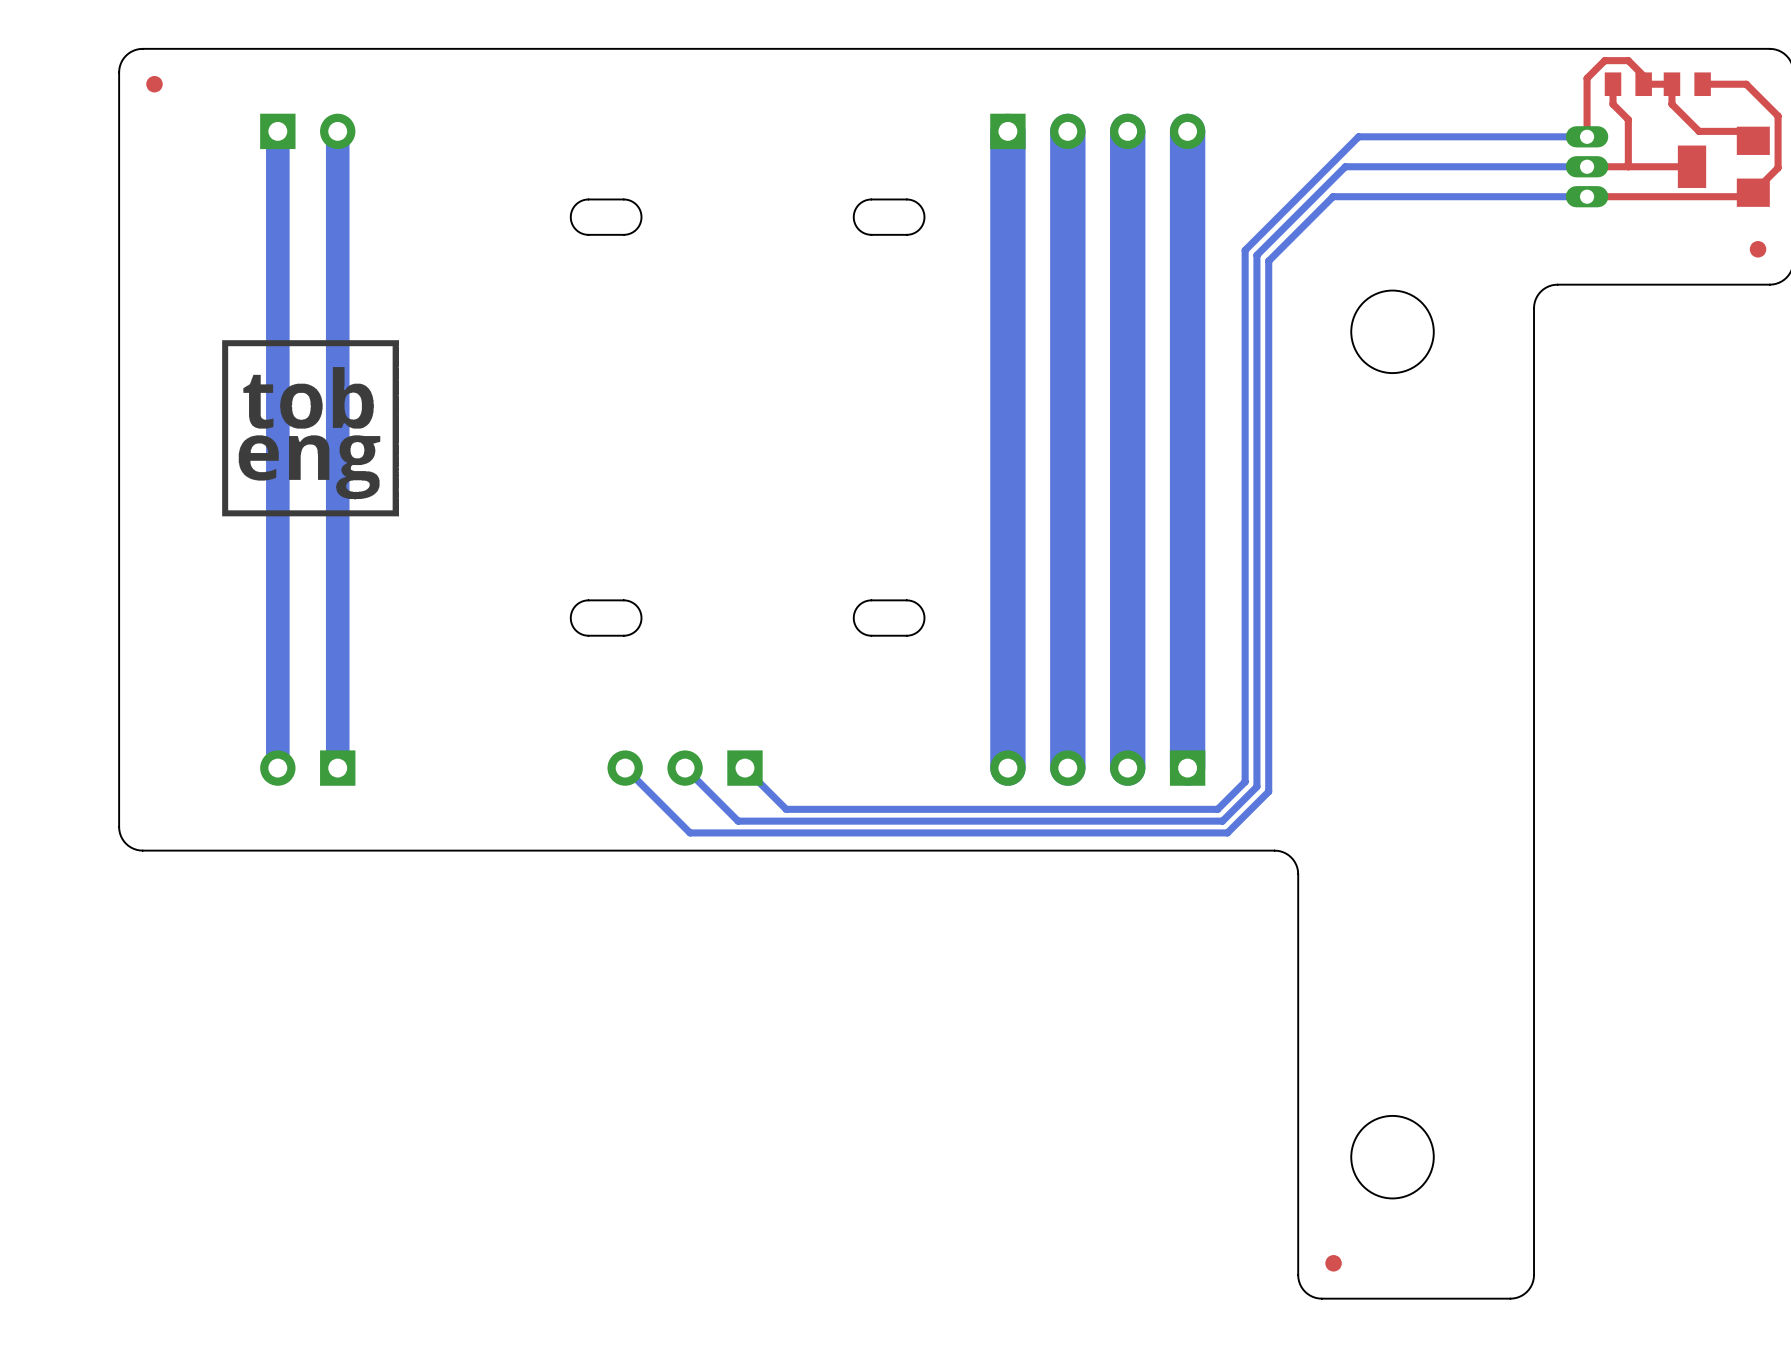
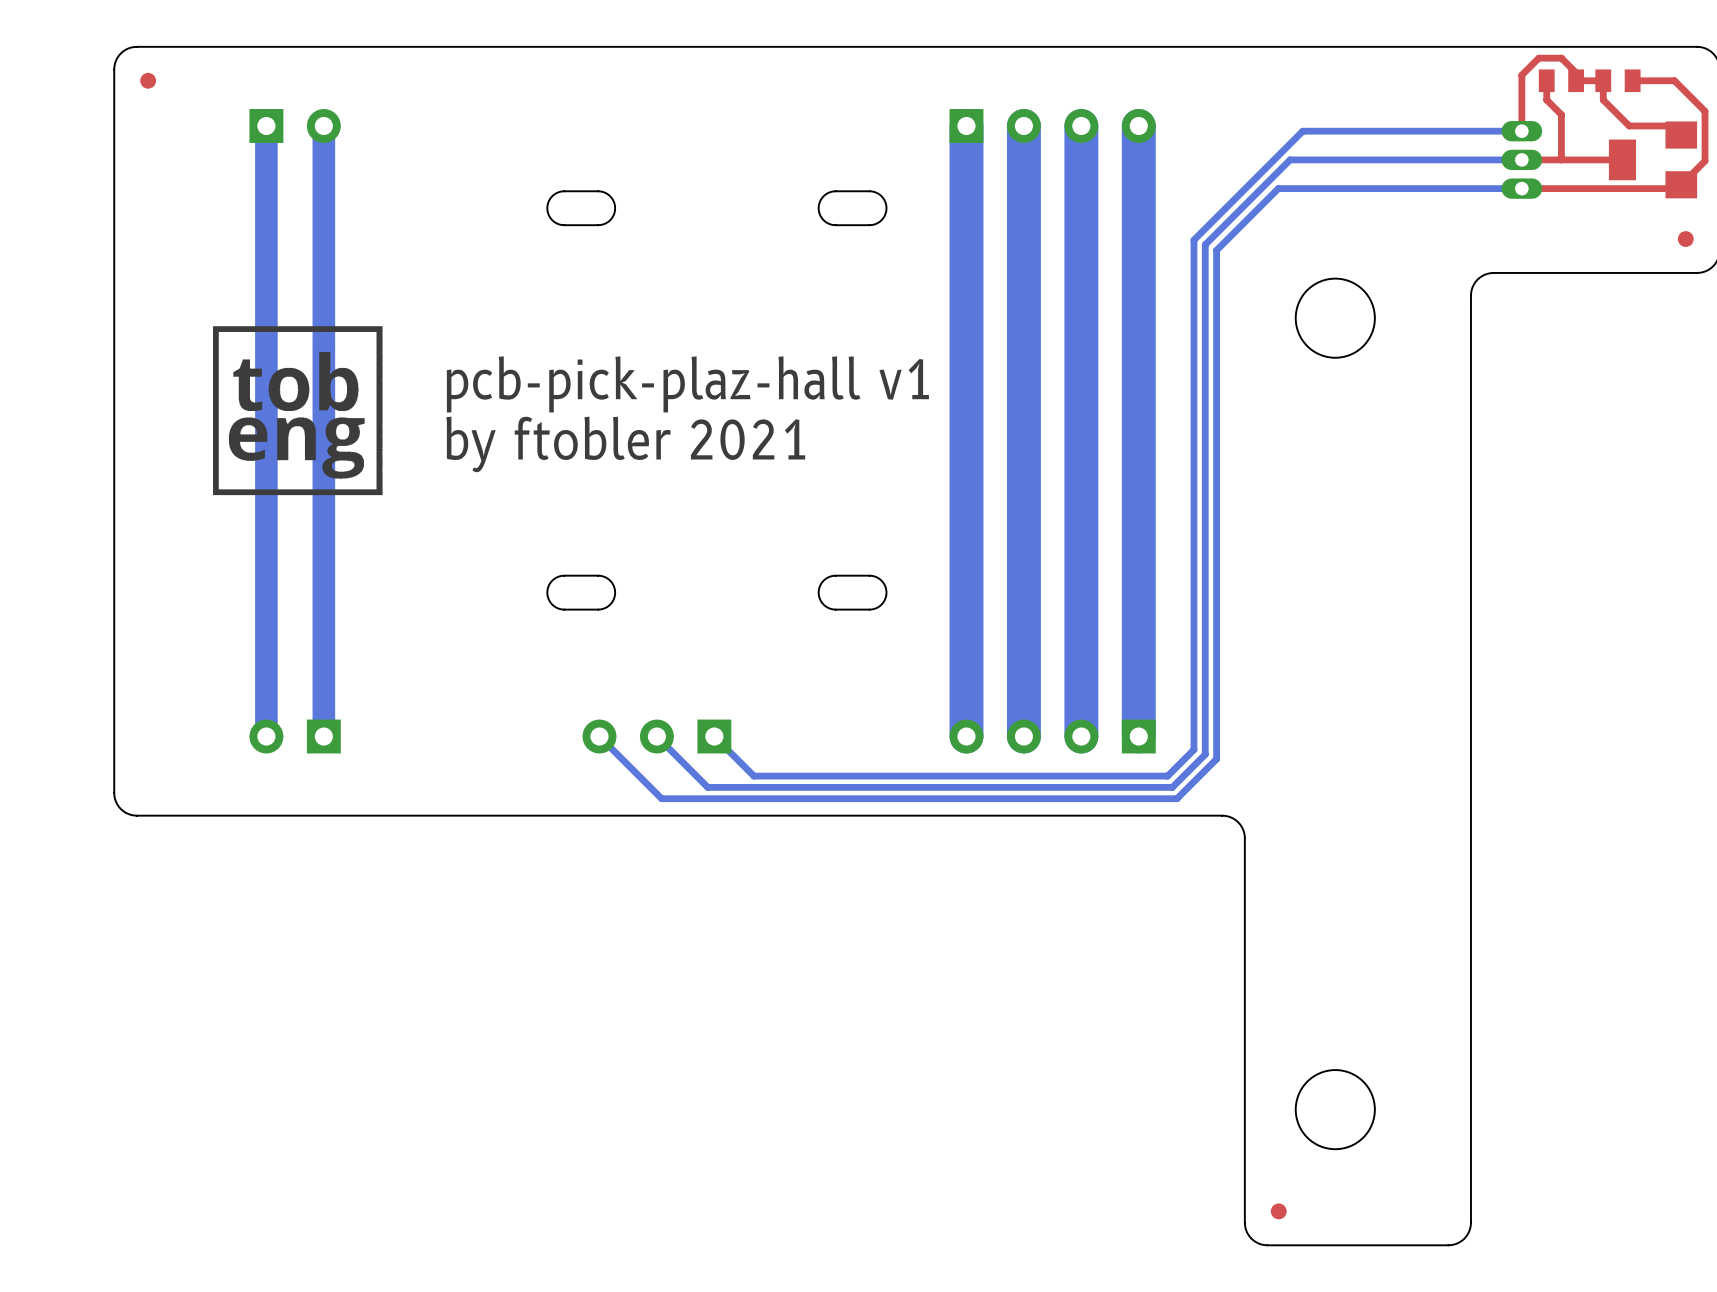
text: none -> pcb-pick-plaz-hall v1 (687, 384)
text: none -> by ftobler 2021 (625, 444)

